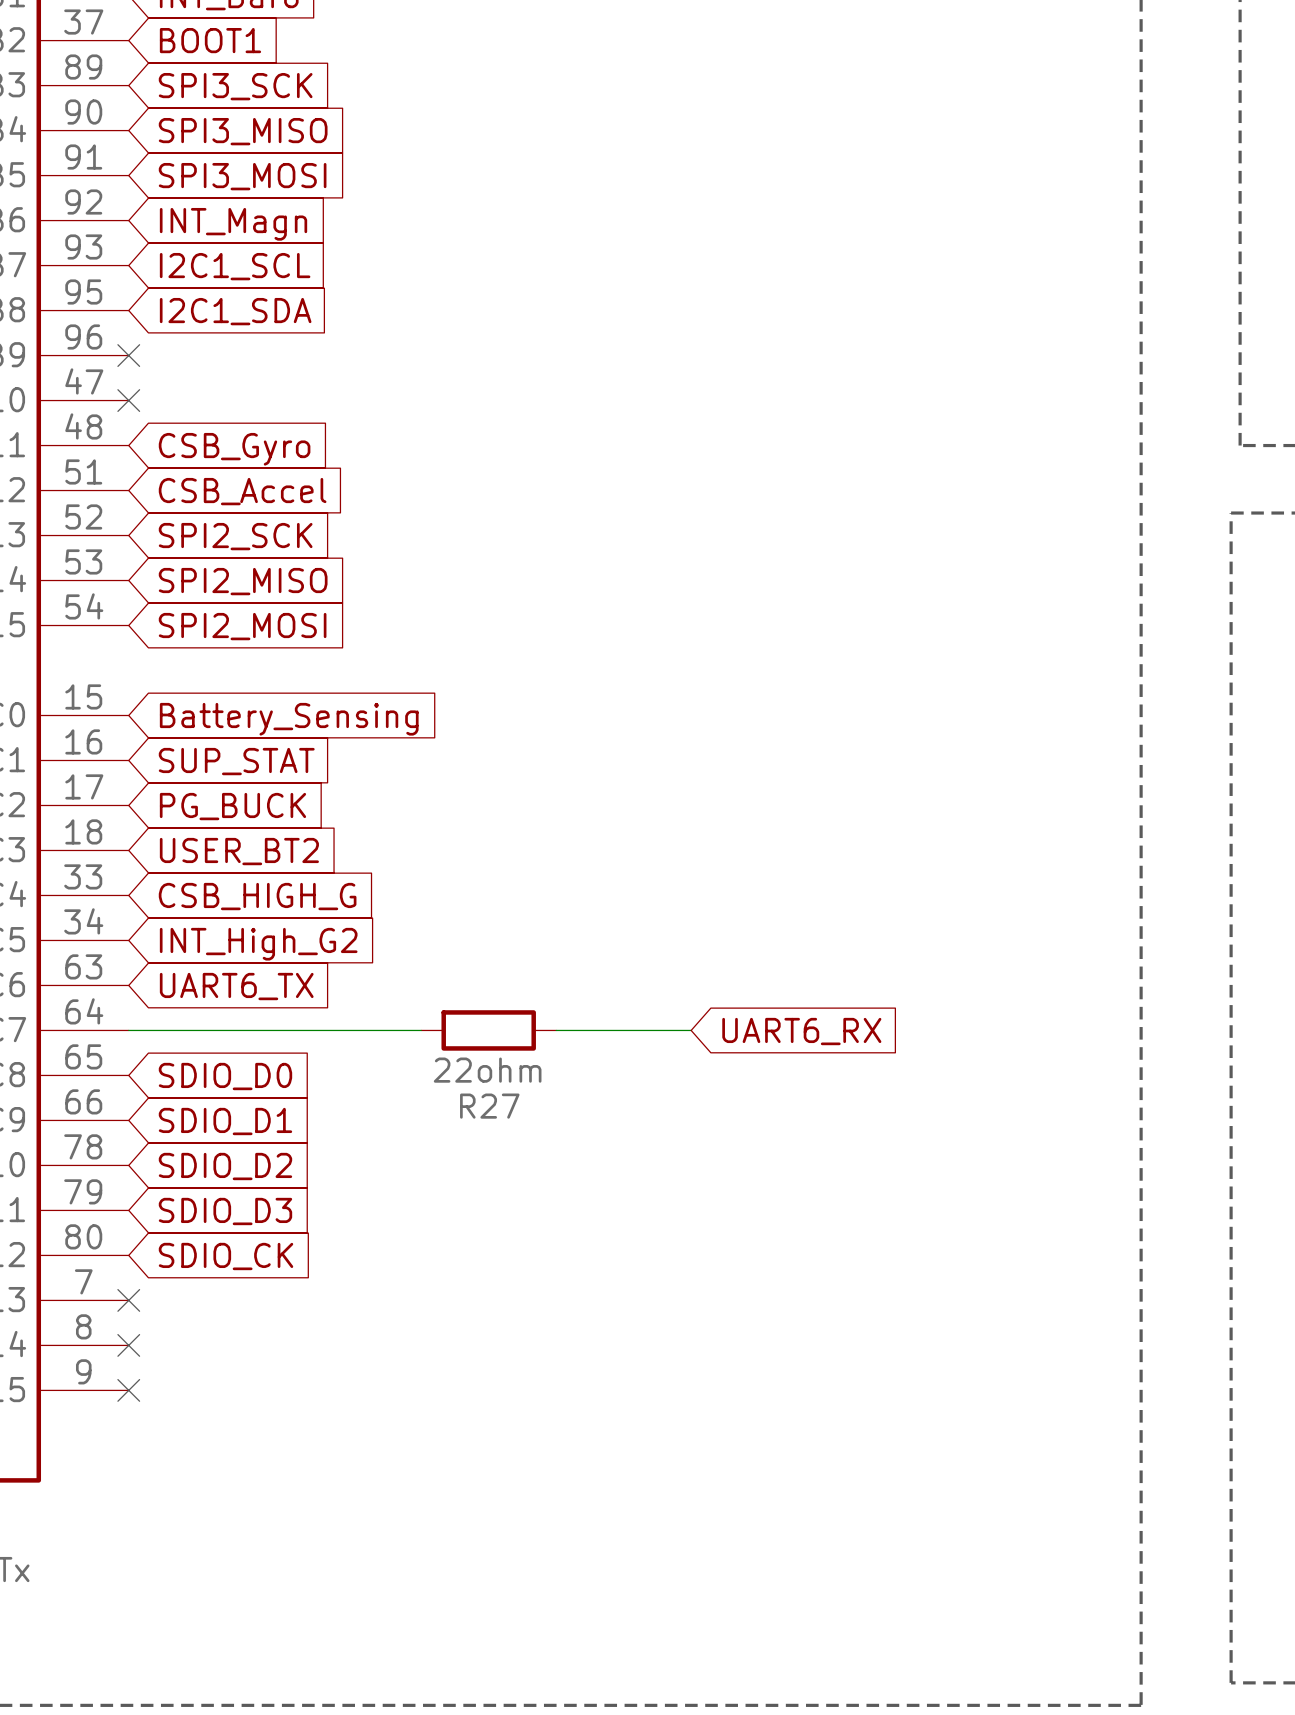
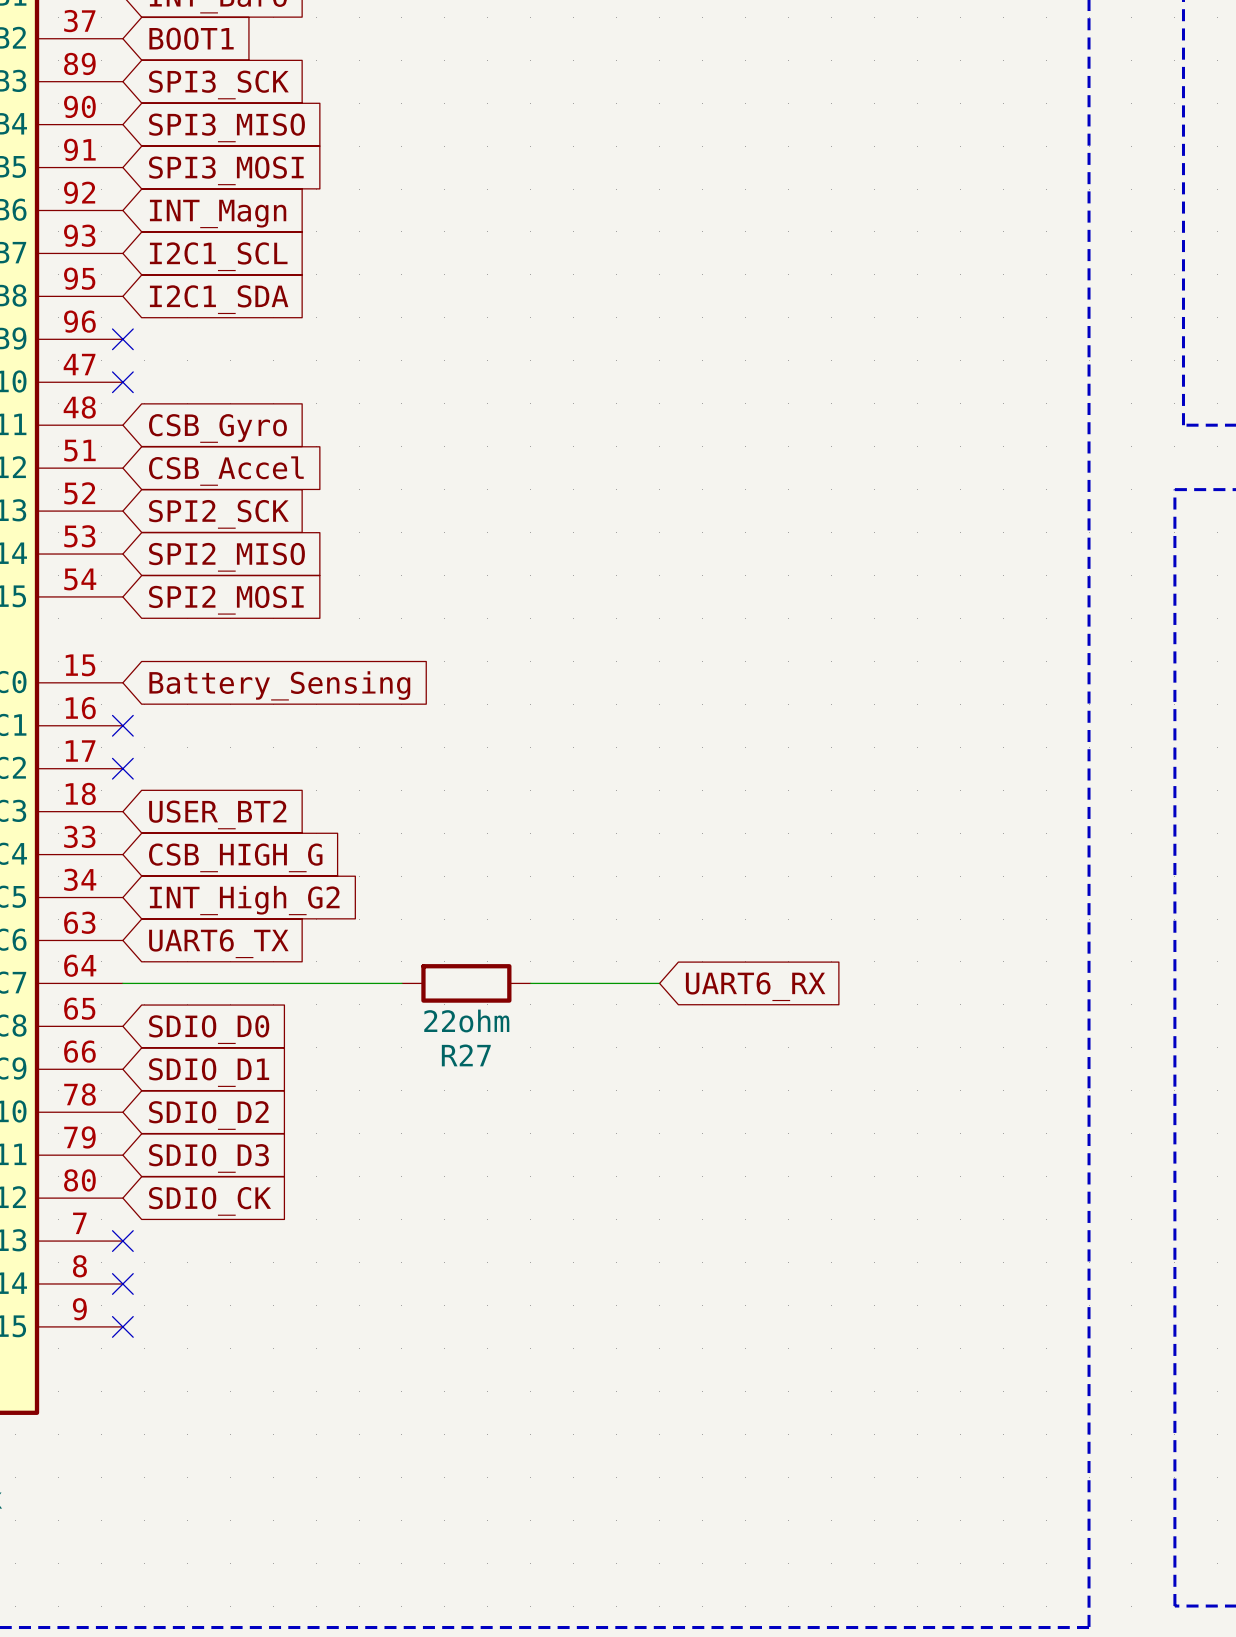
no-connect mark: none -> (122, 725)
global label: SUP_STAT (236, 761) -> none
no-connect mark: none -> (122, 768)
global label: PG_BUCK (232, 806) -> none

